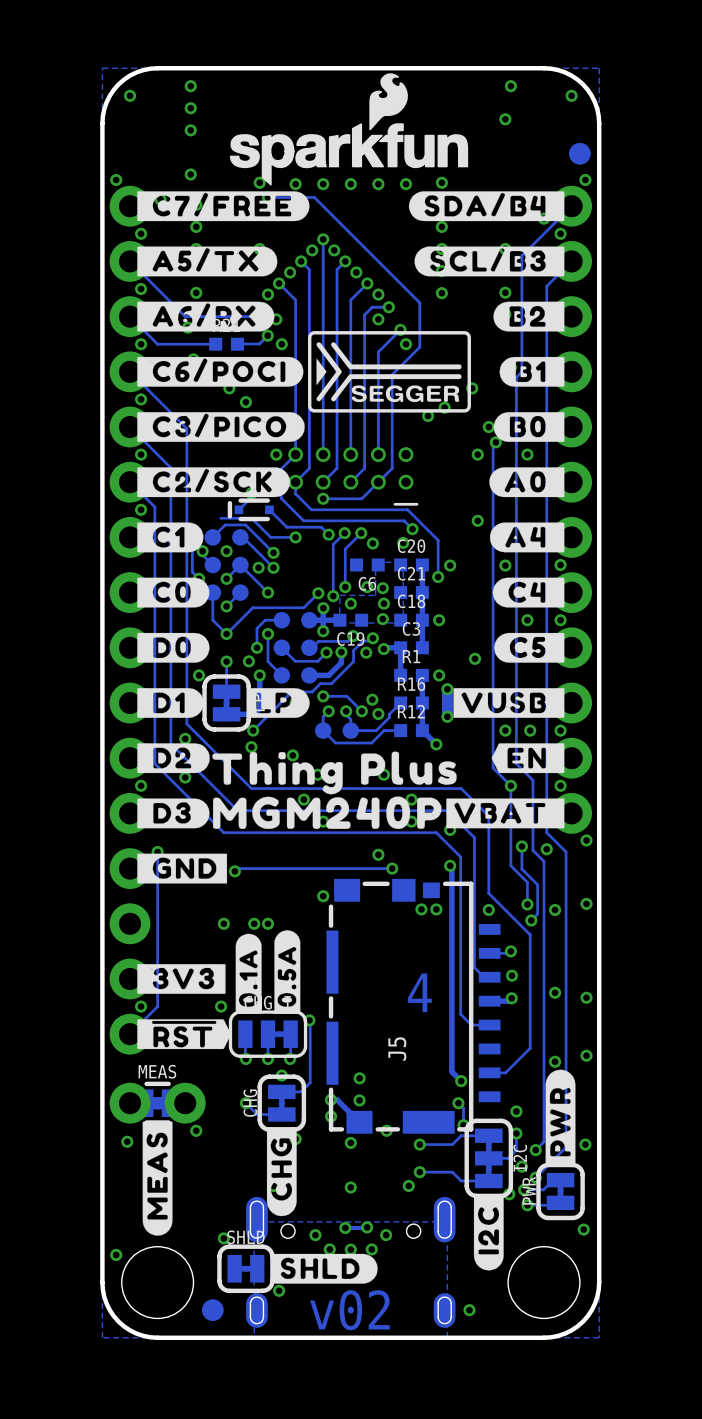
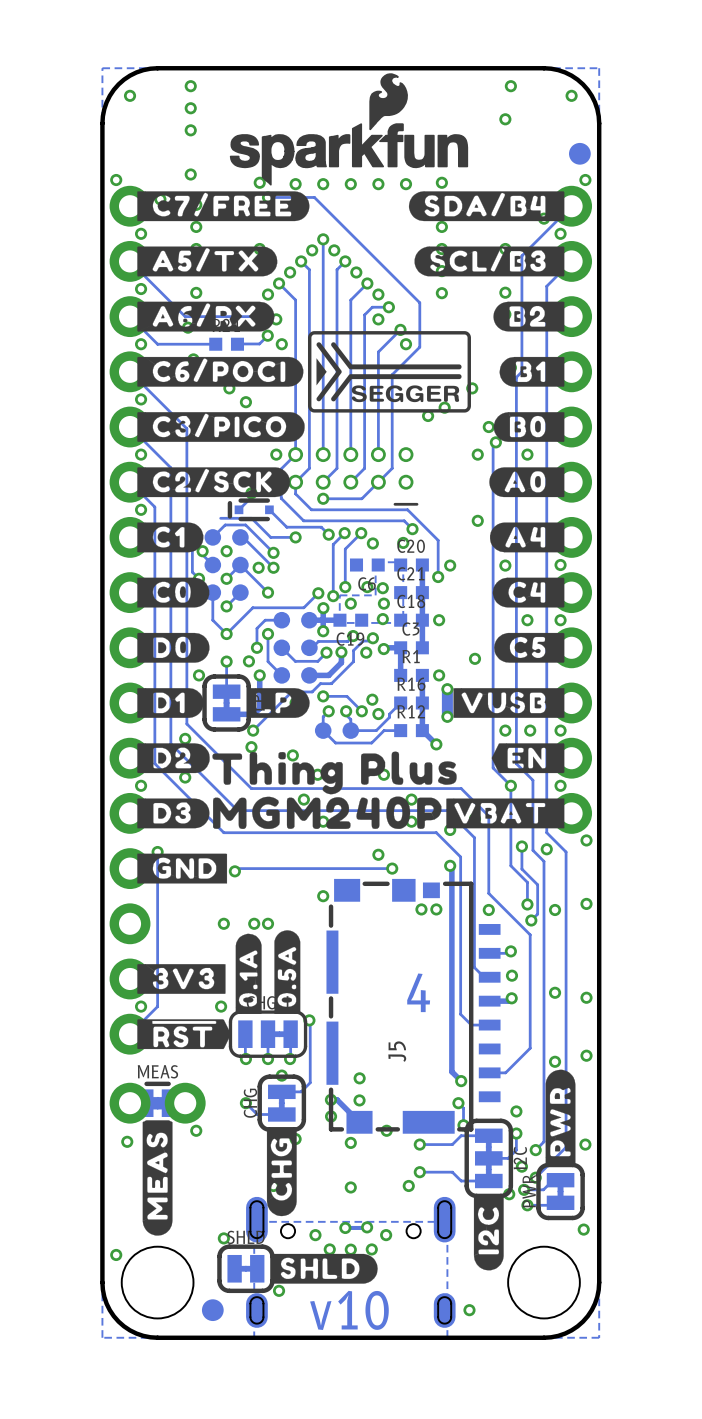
text: v02 (349, 1310) -> v10 (349, 1310)

